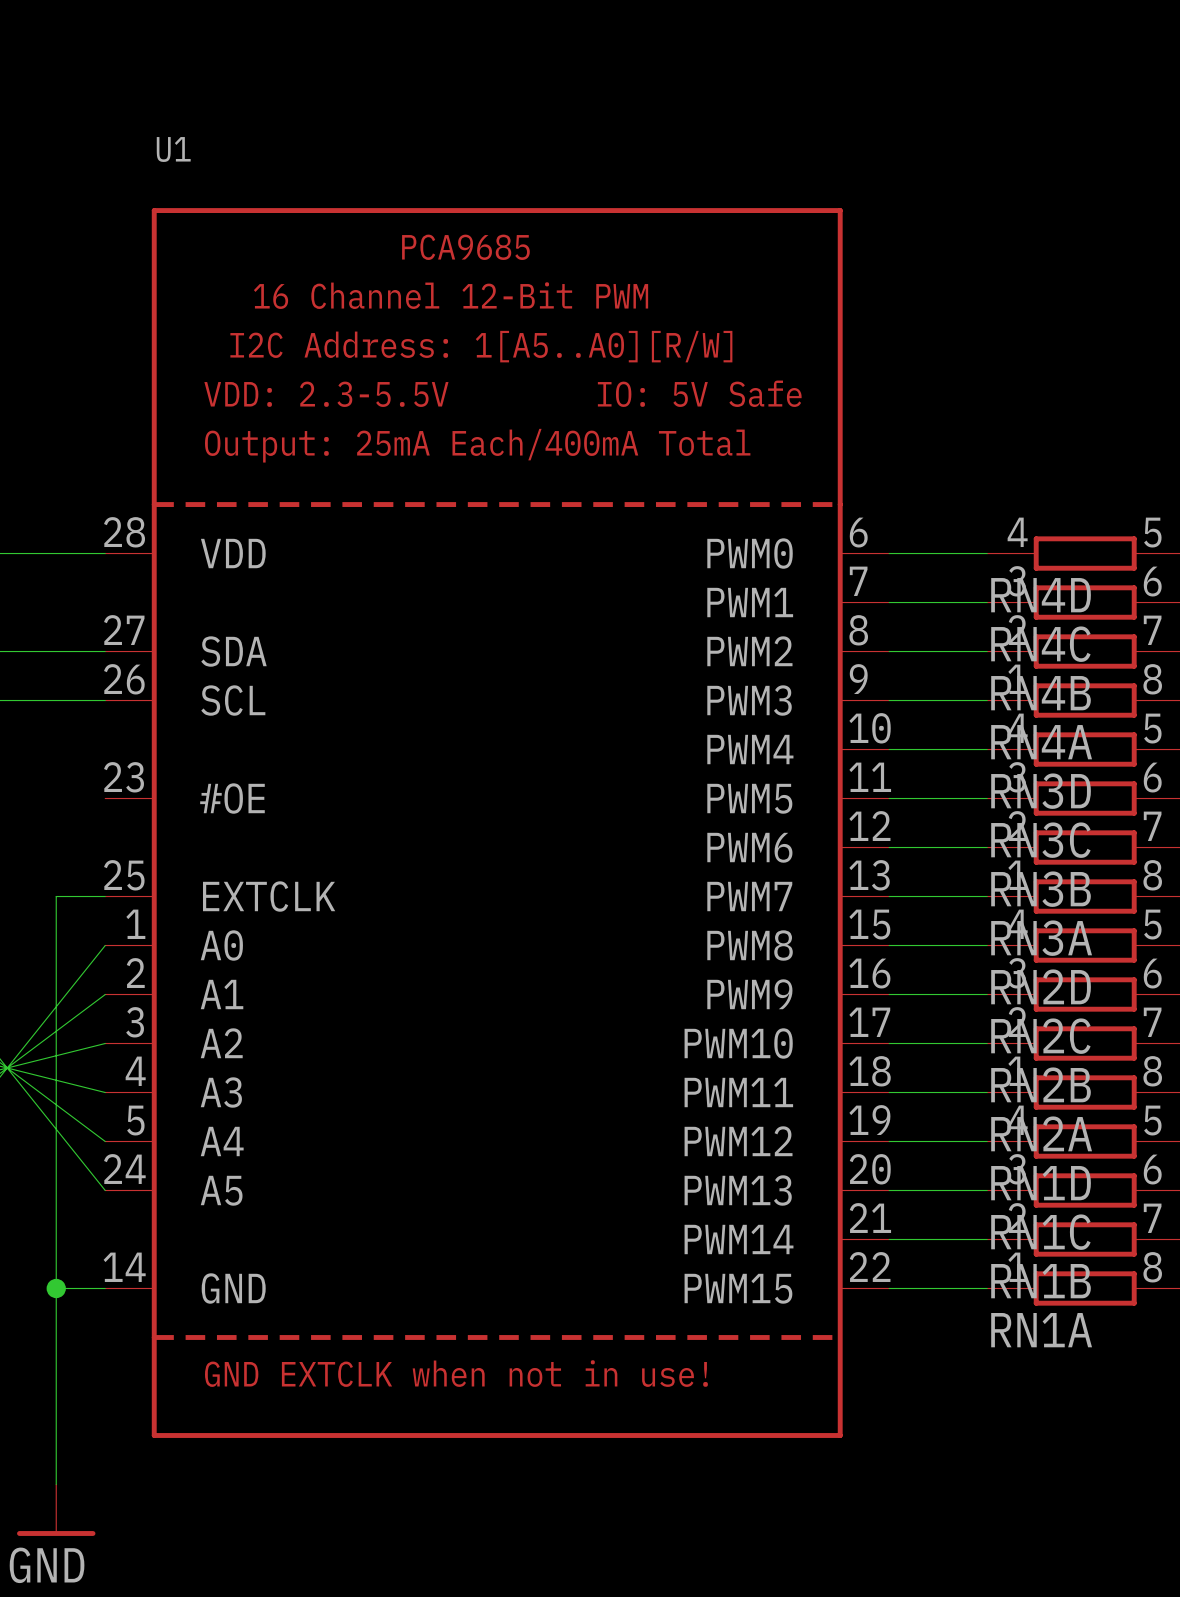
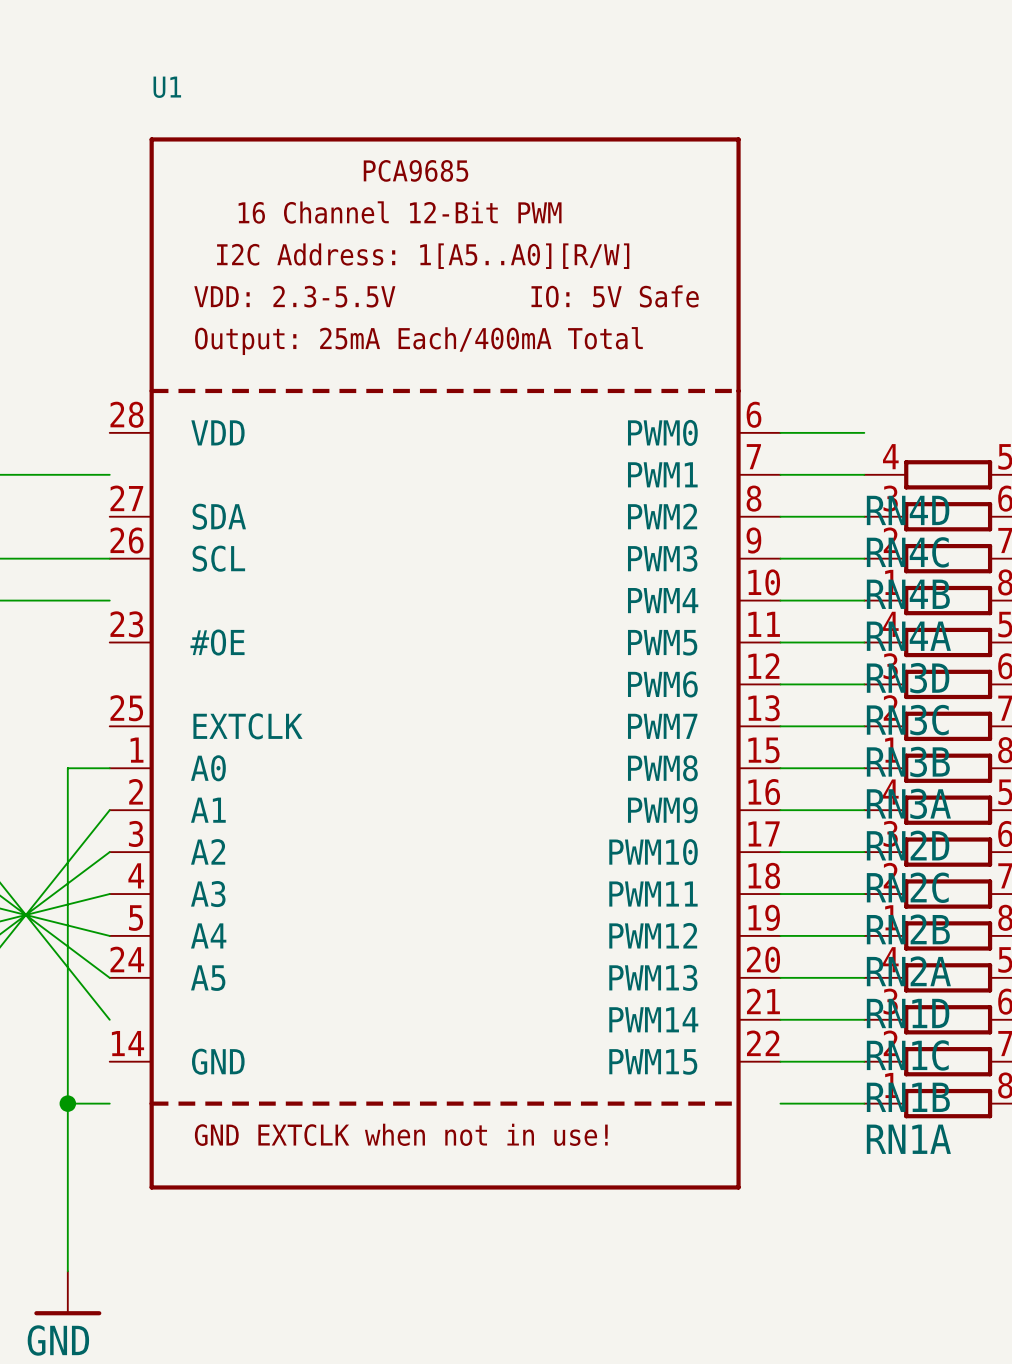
wire: none -> (780, 432) (864, 432)
U1 position: (497, 823) -> (445, 663)

